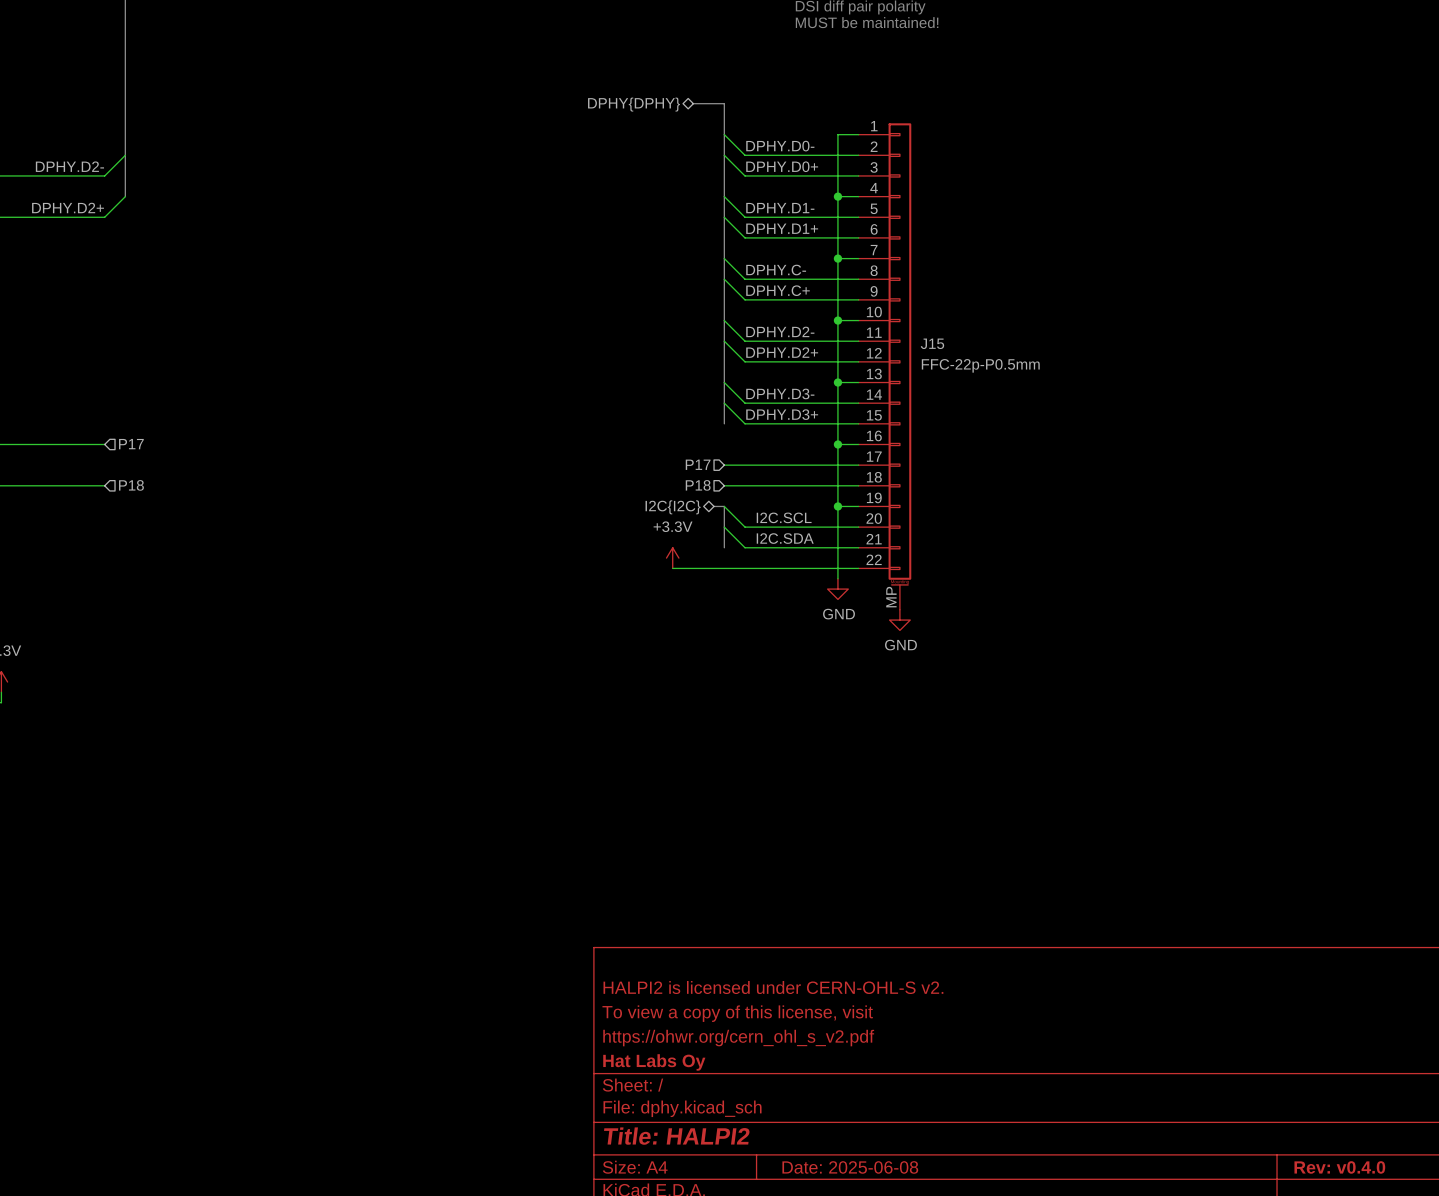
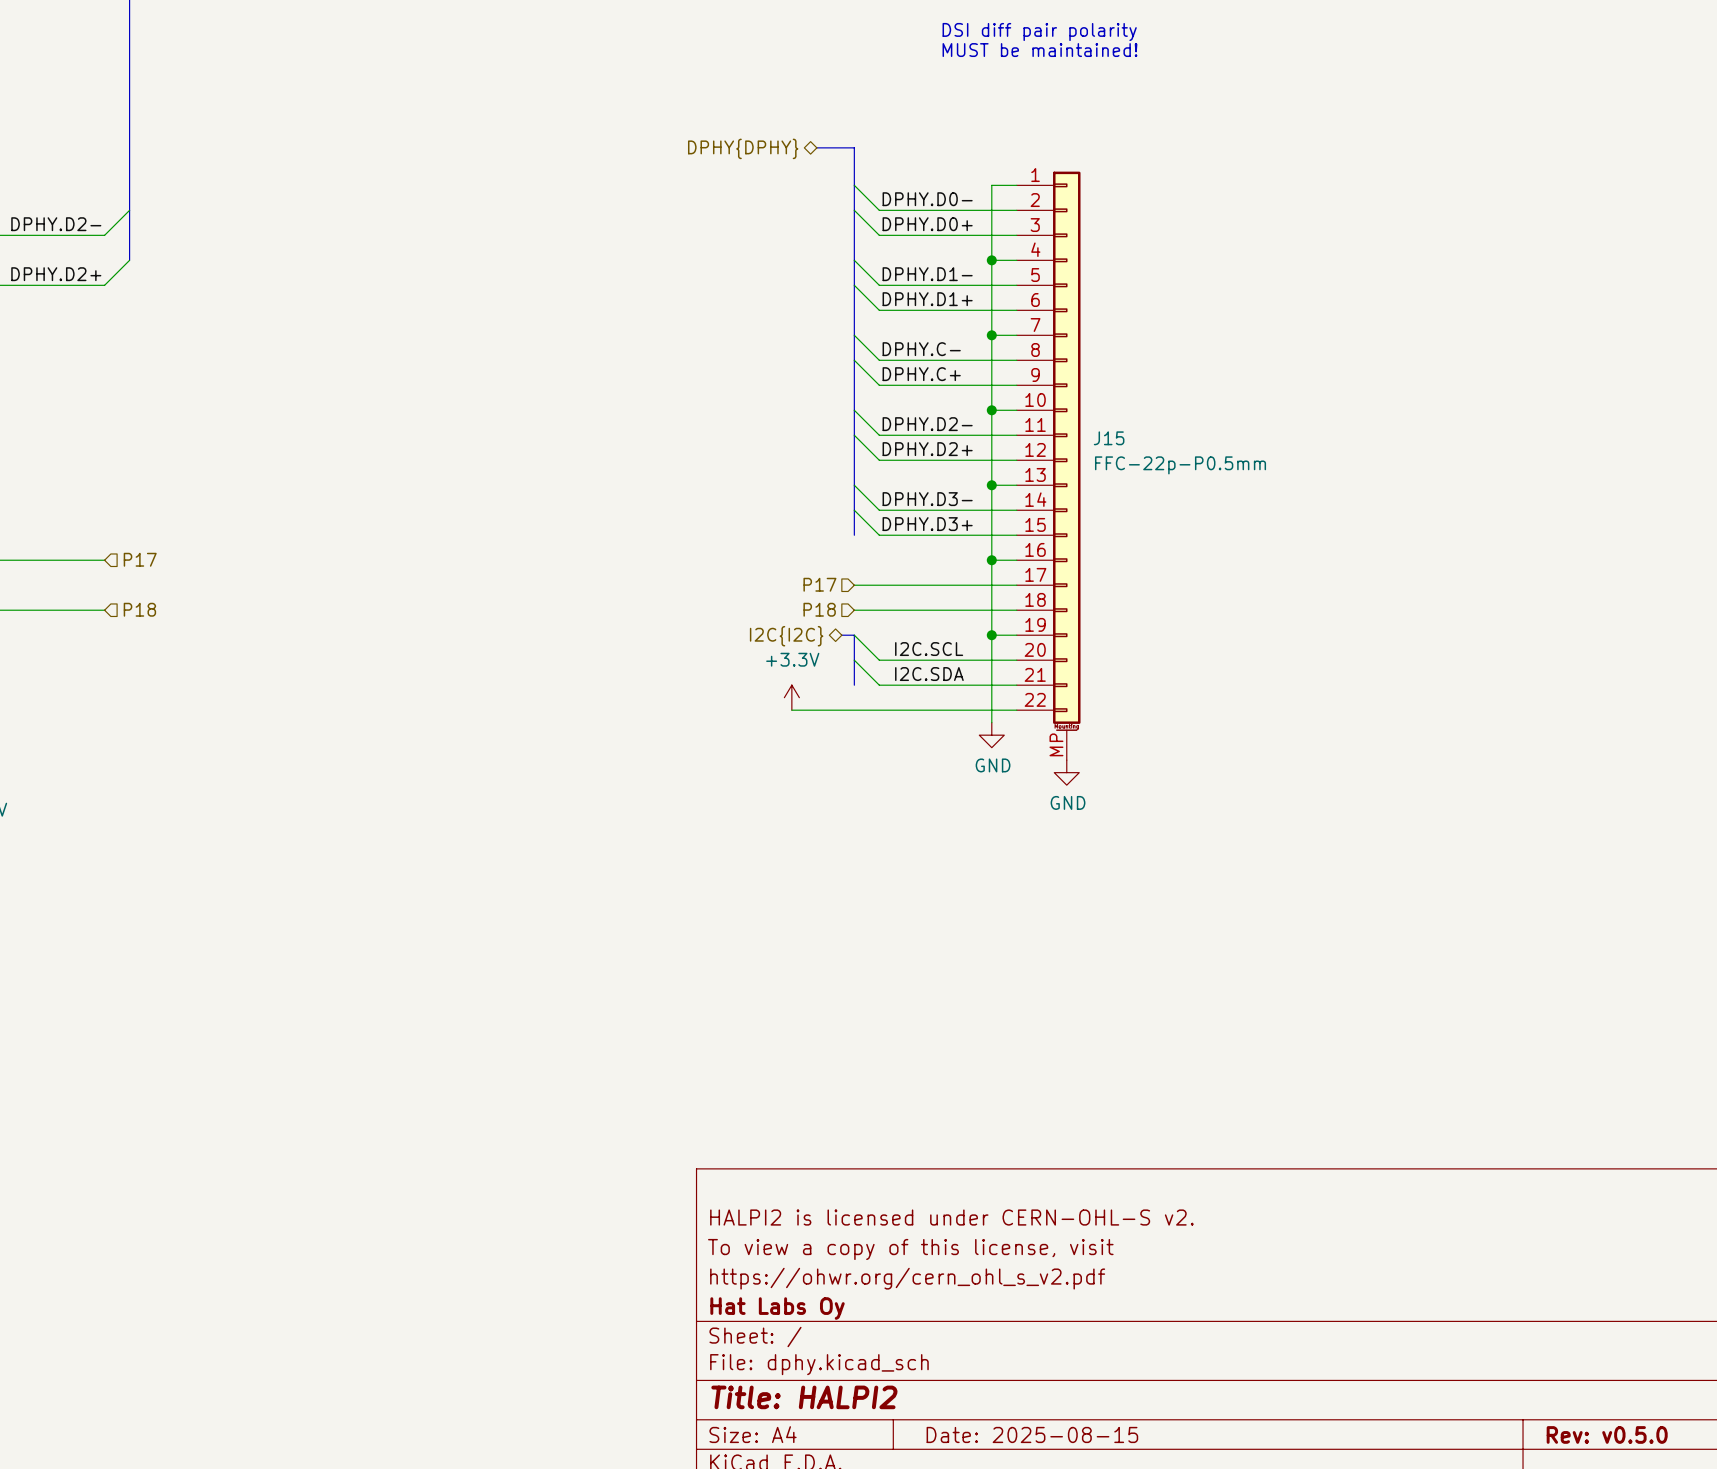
title block: Date: 2025-06-08 (850, 1167) -> Date: 2025-08-15 (1032, 1434)
title block: Rev: v0.4.0 (1339, 1167) -> Rev: v0.5.0 (1607, 1434)

